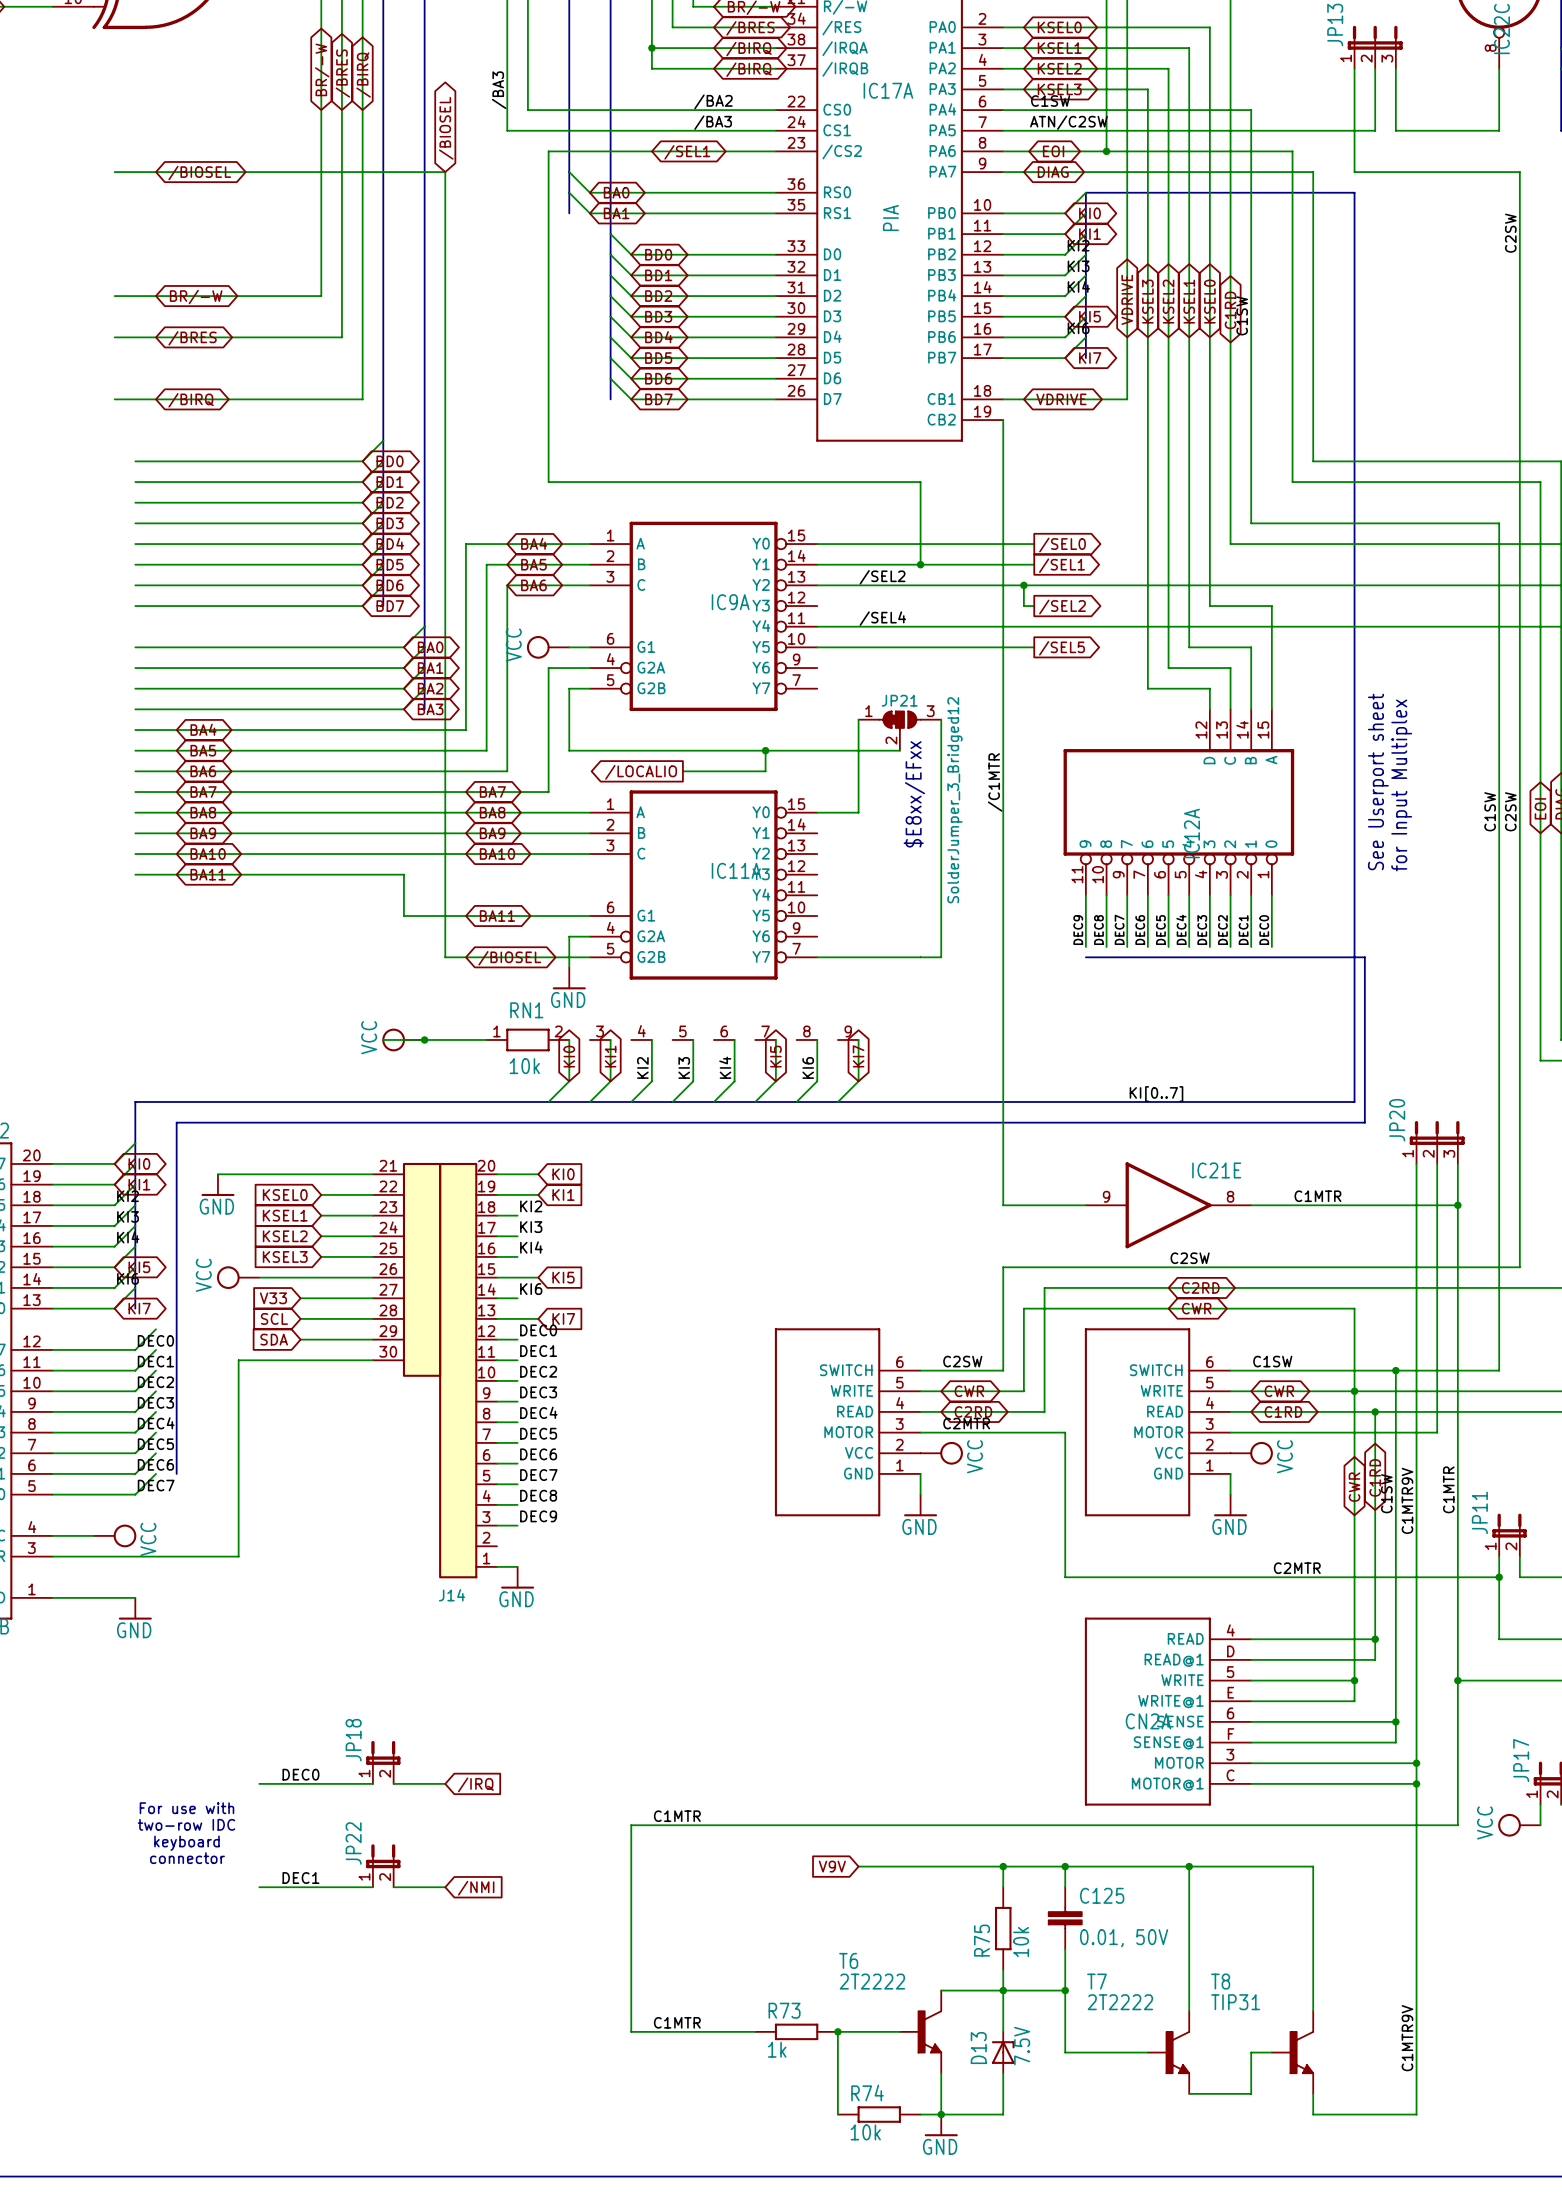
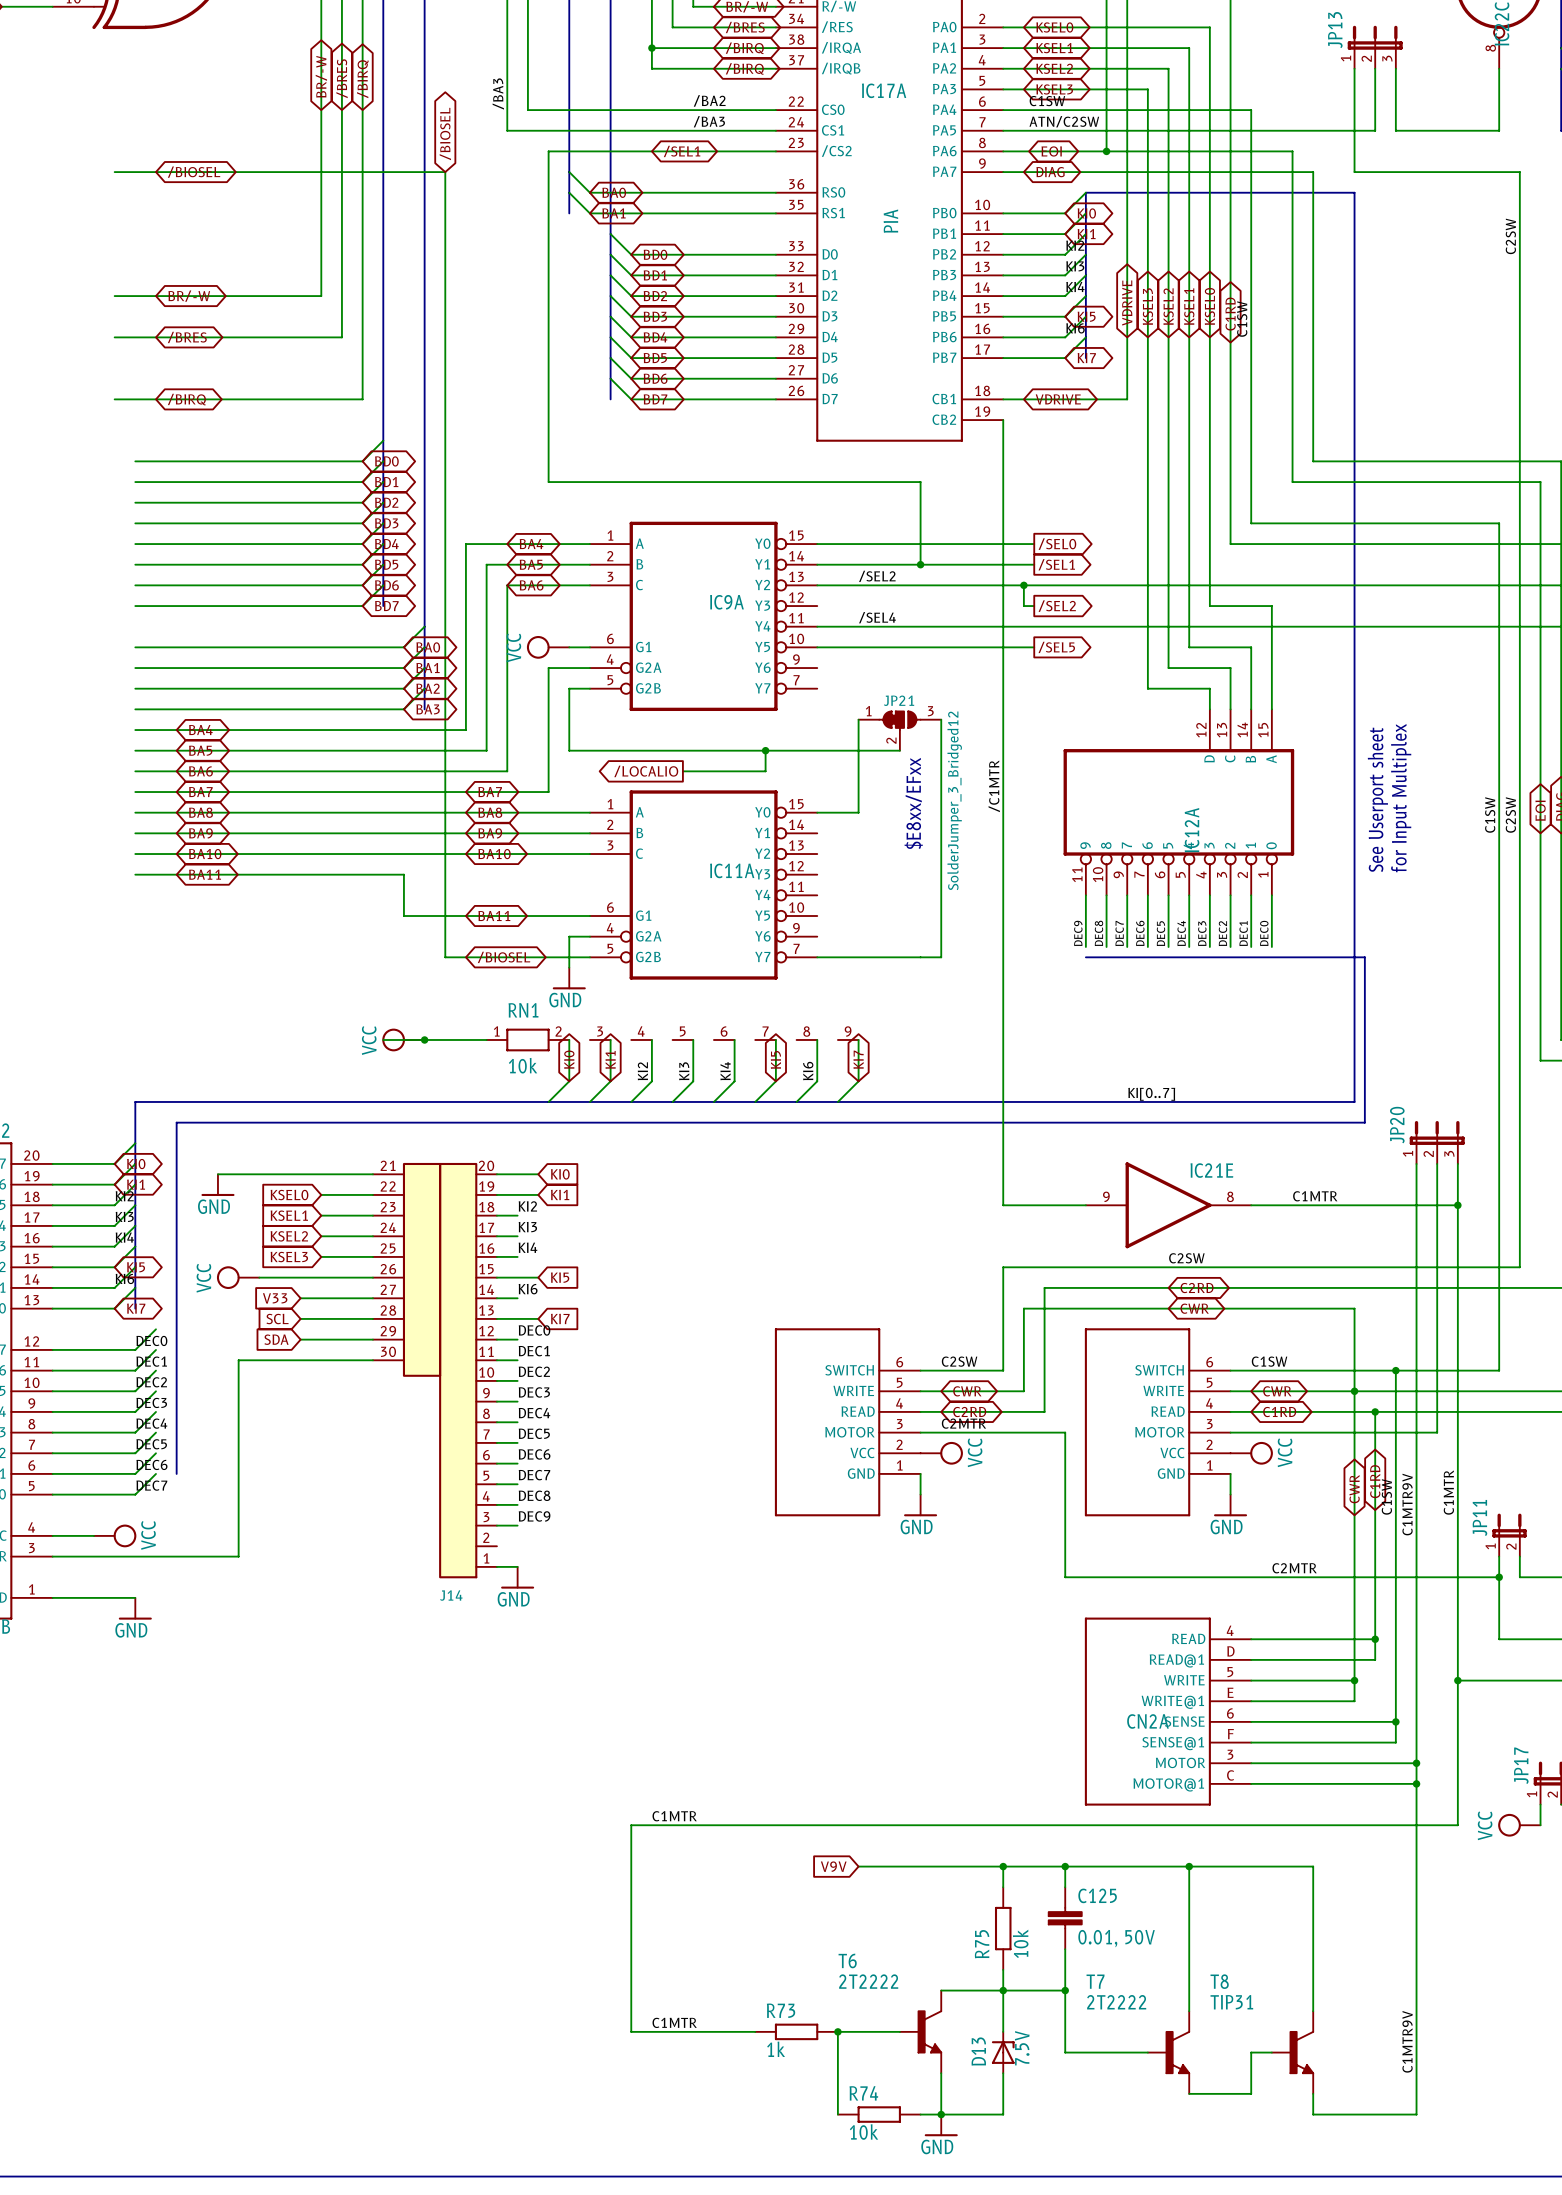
JP18: (383, 1762) -> none
label: DEC0 (300, 1774) -> none
wire: (259, 1783) (372, 1783) -> none
wire: (393, 1783) (445, 1783) -> none
global label: /IRQ (475, 1784) -> none
text: For use with (186, 1808) -> none
text: two-row IDC (186, 1824) -> none
text: keyboard (186, 1843) -> none
text: connector (187, 1858) -> none
JP22: (383, 1865) -> none
label: DEC1 (300, 1878) -> none
wire: (259, 1887) (372, 1887) -> none
wire: (393, 1887) (445, 1887) -> none
global label: /NMI (476, 1888) -> none

